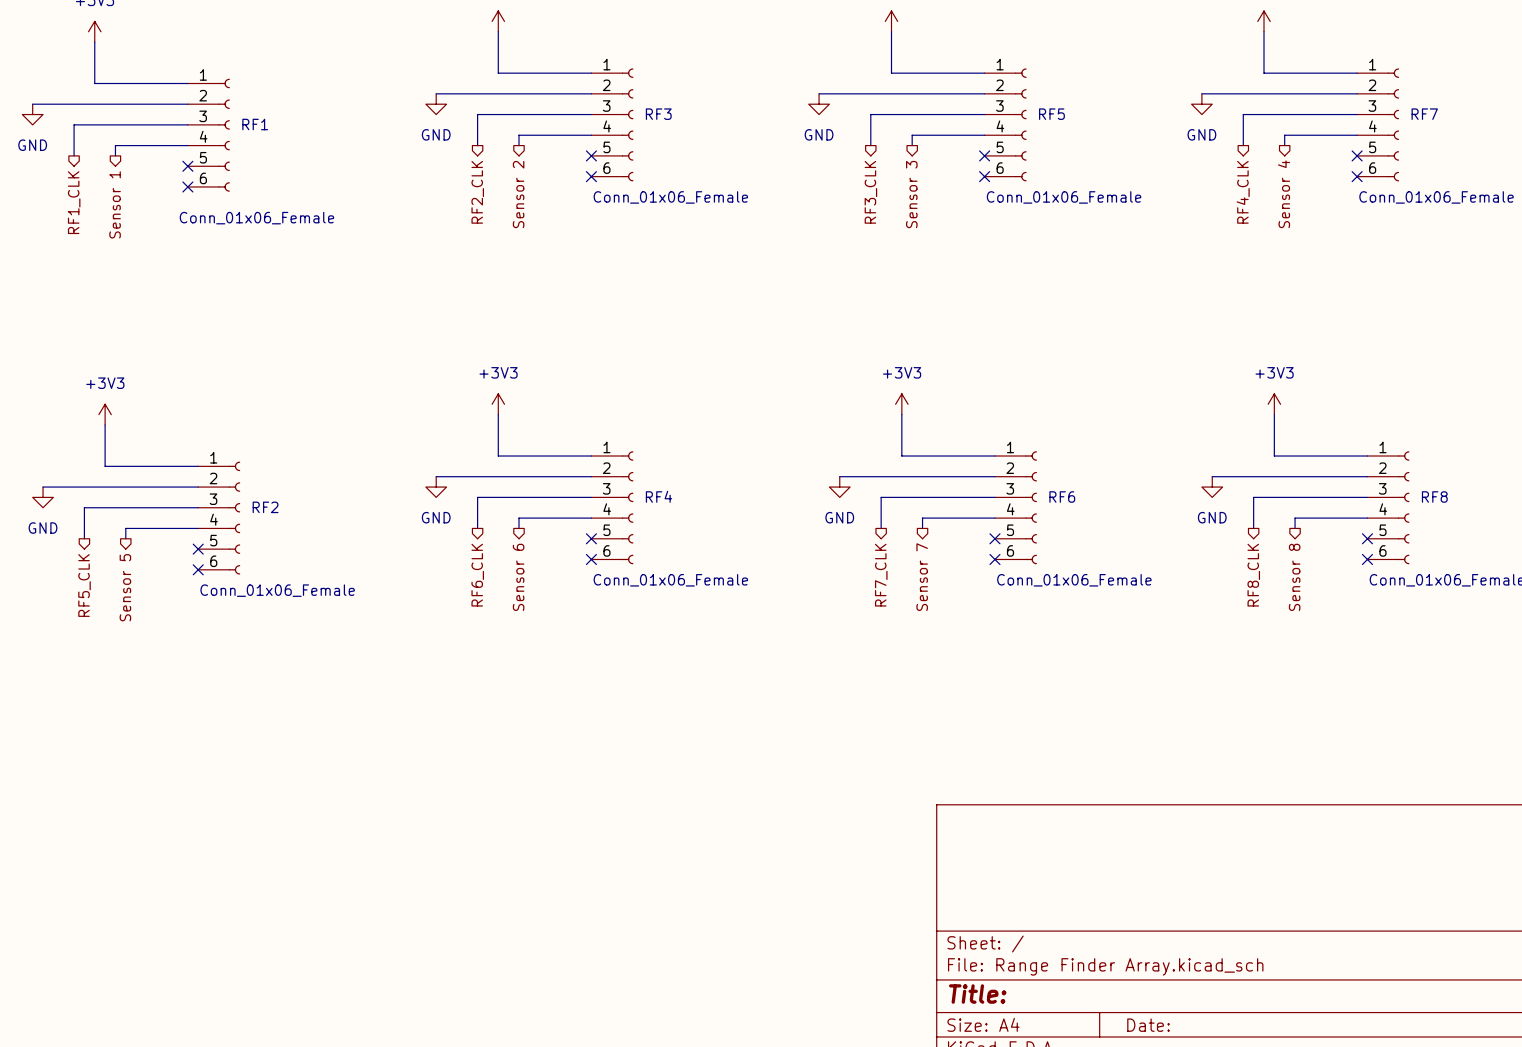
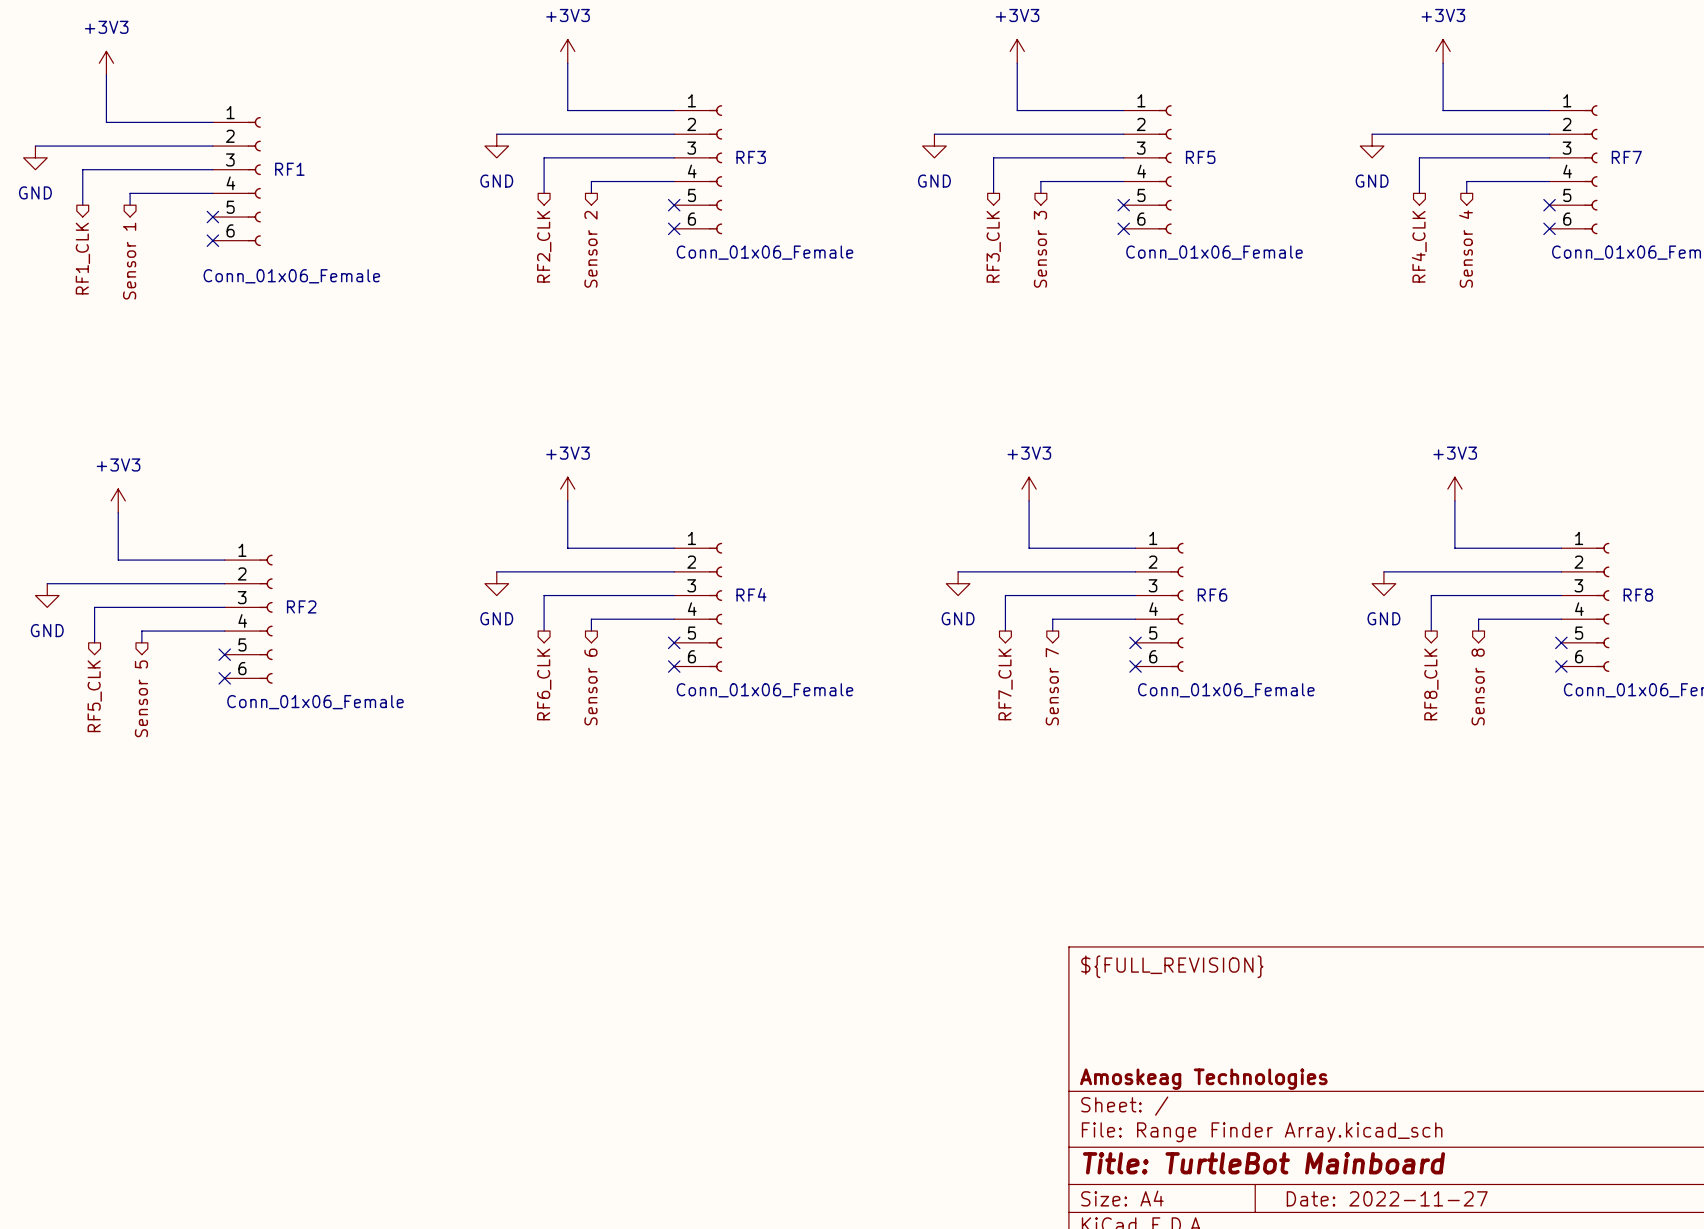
title block: none -> ${FULL_REVISION} (1172, 966)
title block: none -> Amoskeag Technologies (1203, 1079)
title block: Title: (977, 994) -> Title: TurtleBot Mainboard (1263, 1163)
title block: Date: (1148, 1025) -> Date: 2022-11-27 (1387, 1198)

